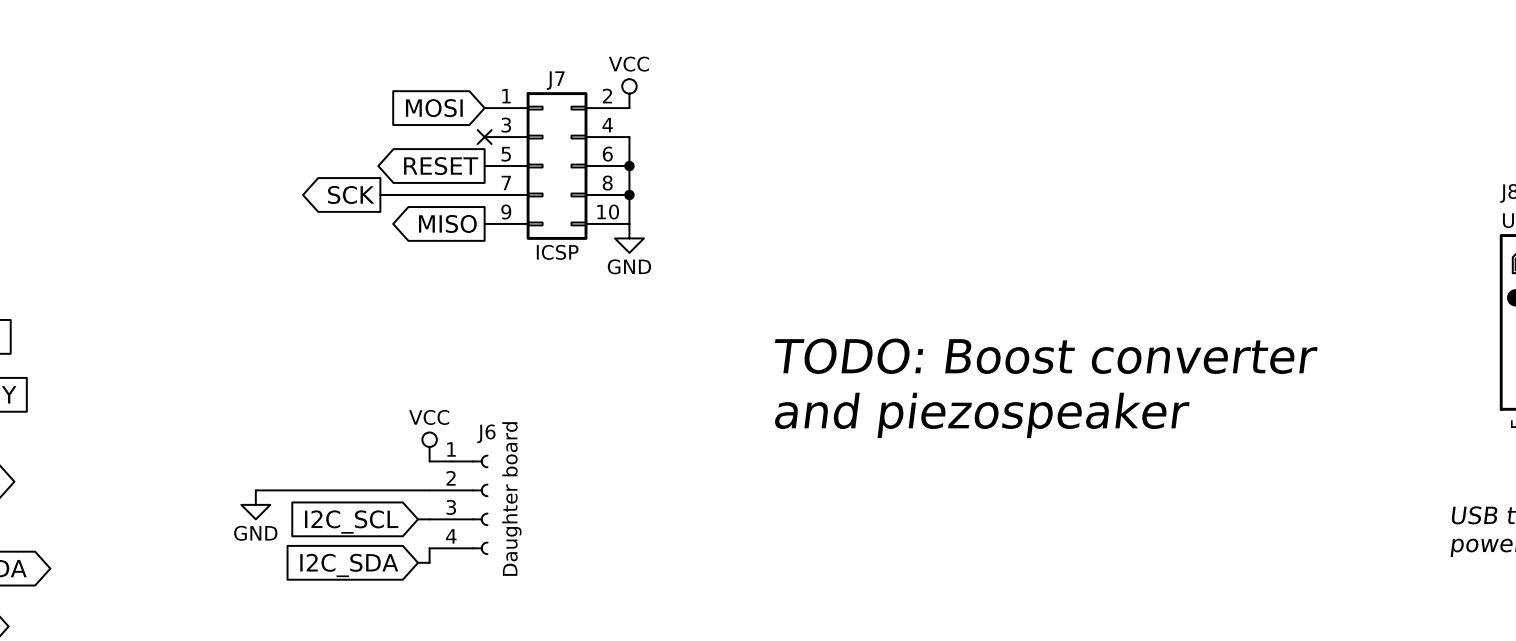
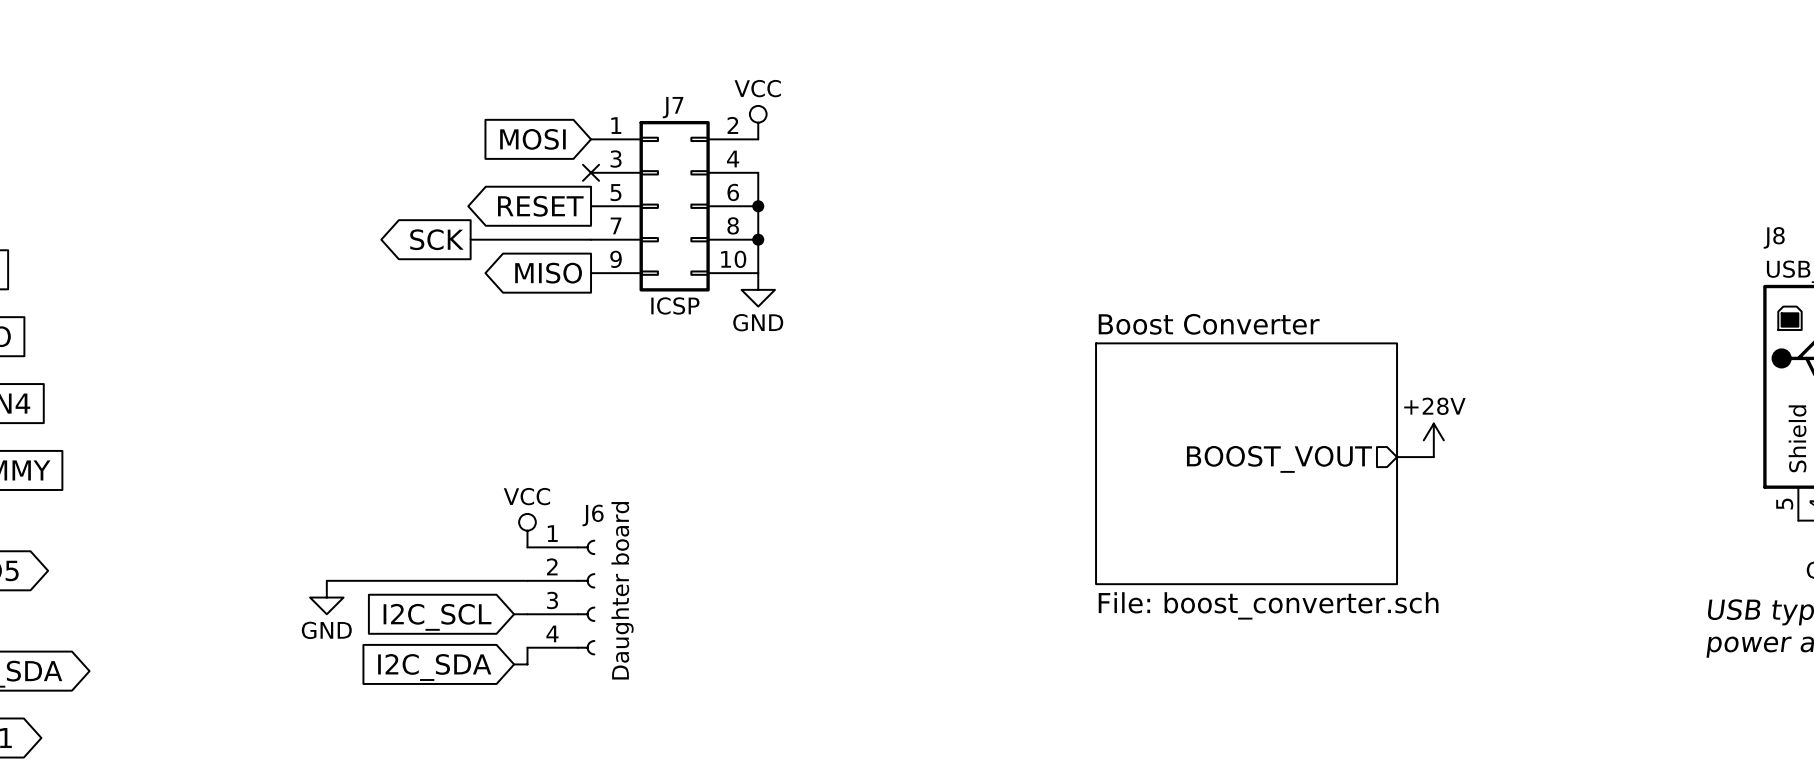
text: TODO: Boost converter (1046, 356) -> none
power symbol: none -> +28V (1433, 440)
wire: none -> (1397, 457) (1433, 457)
sheet pin: none -> BOOST_VOUT (1279, 459)
sheet Boost Converter: none -> File: boost_converter.sch (1246, 463)
text: and piezospeaker (982, 415) -> none

